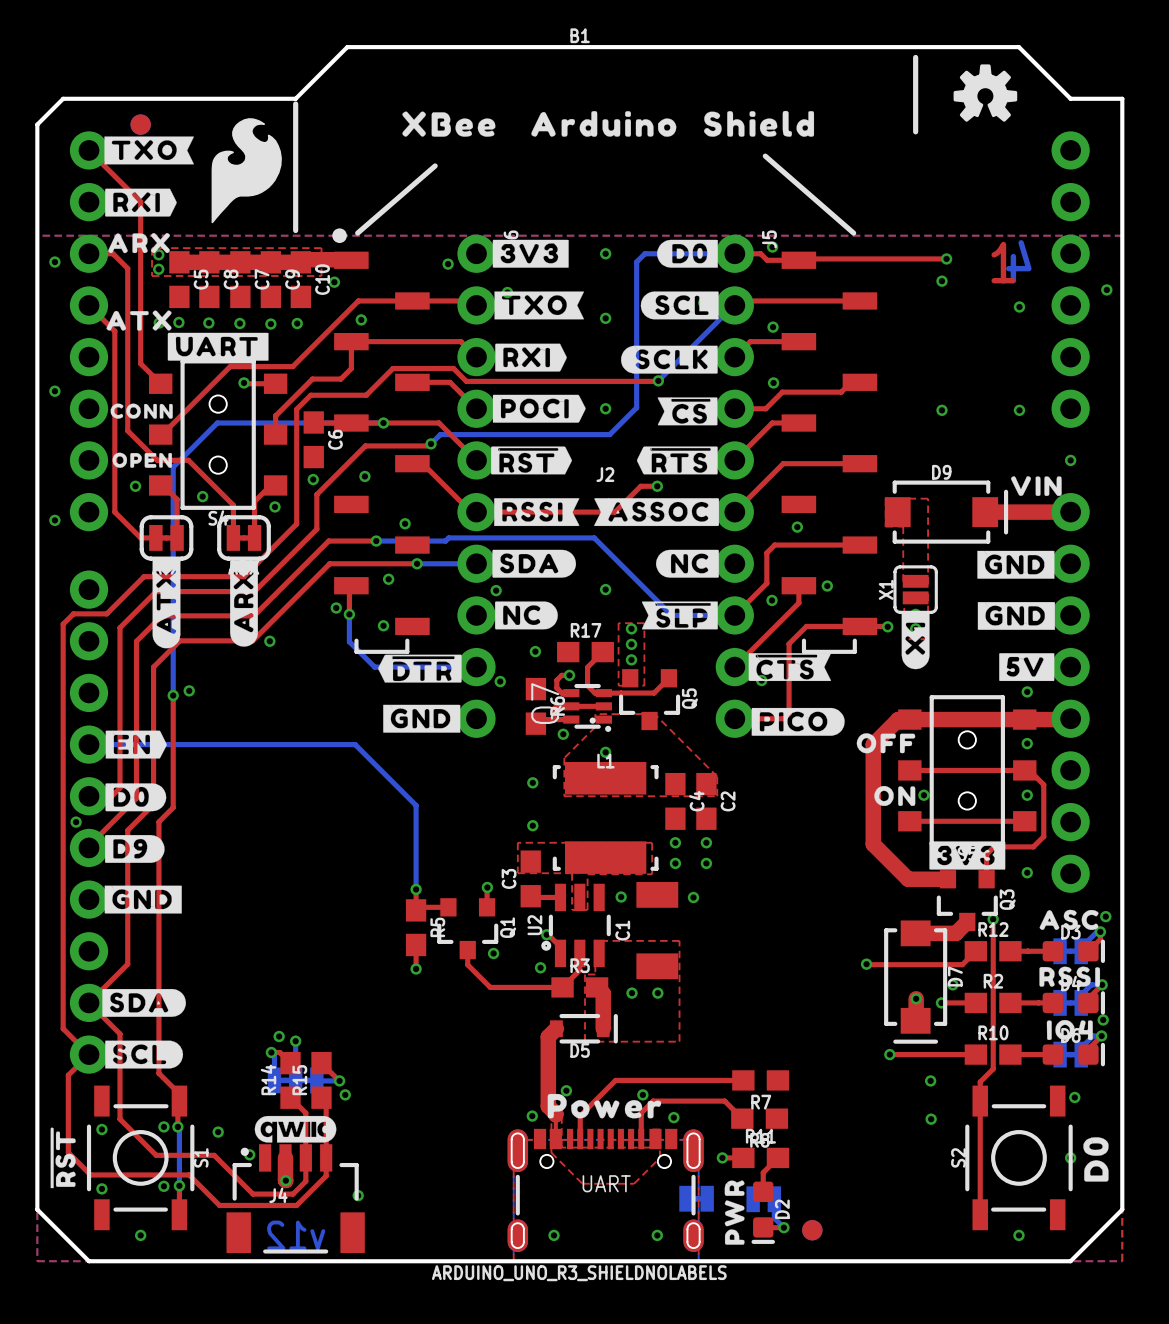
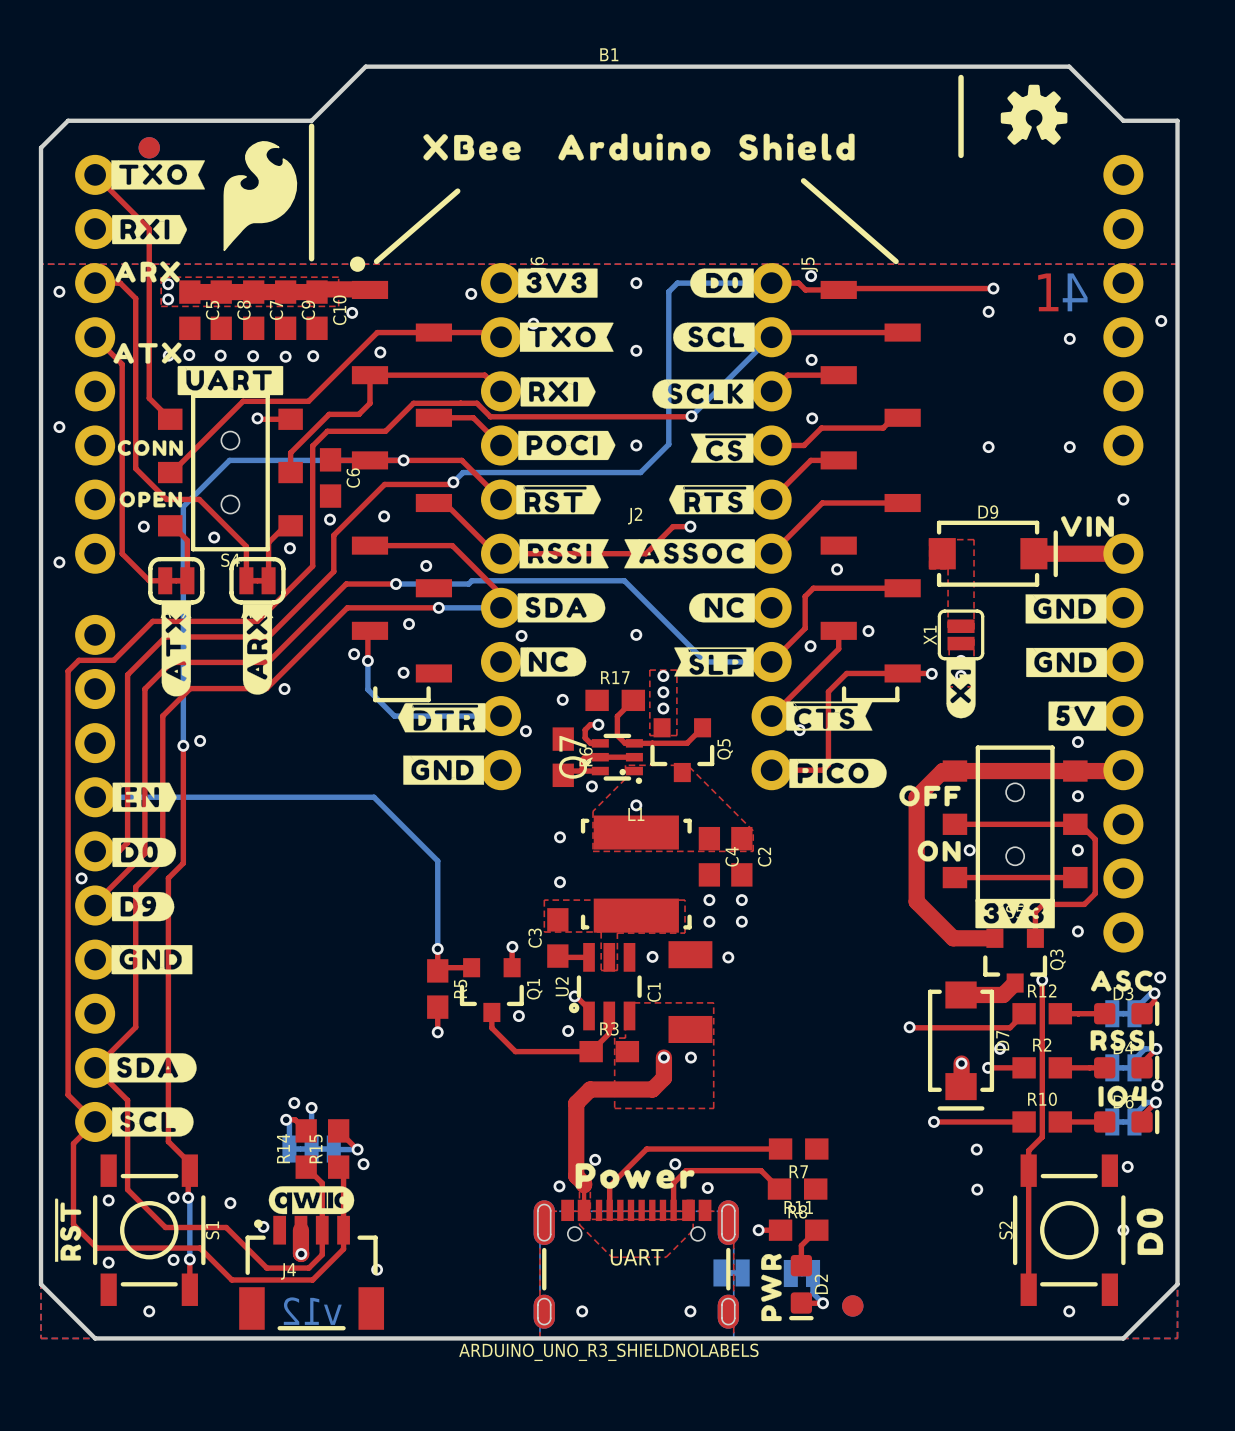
top track: none -> (369, 545) (452, 545) (501, 594) (501, 607)
top track: (597, 987) (603, 993) (603, 1028) -> none
top track: none -> (663, 1057) (663, 1078) (652, 1089) (590, 1089) (584, 1094)
D5: (583, 1028) -> none

